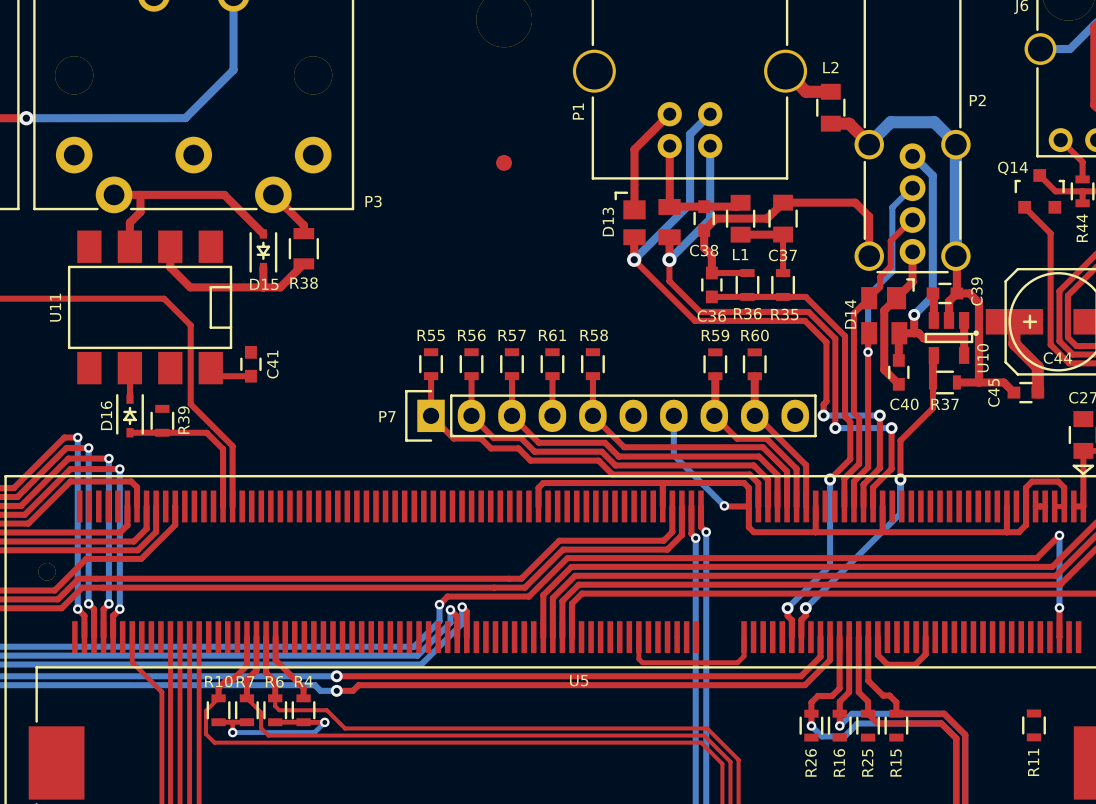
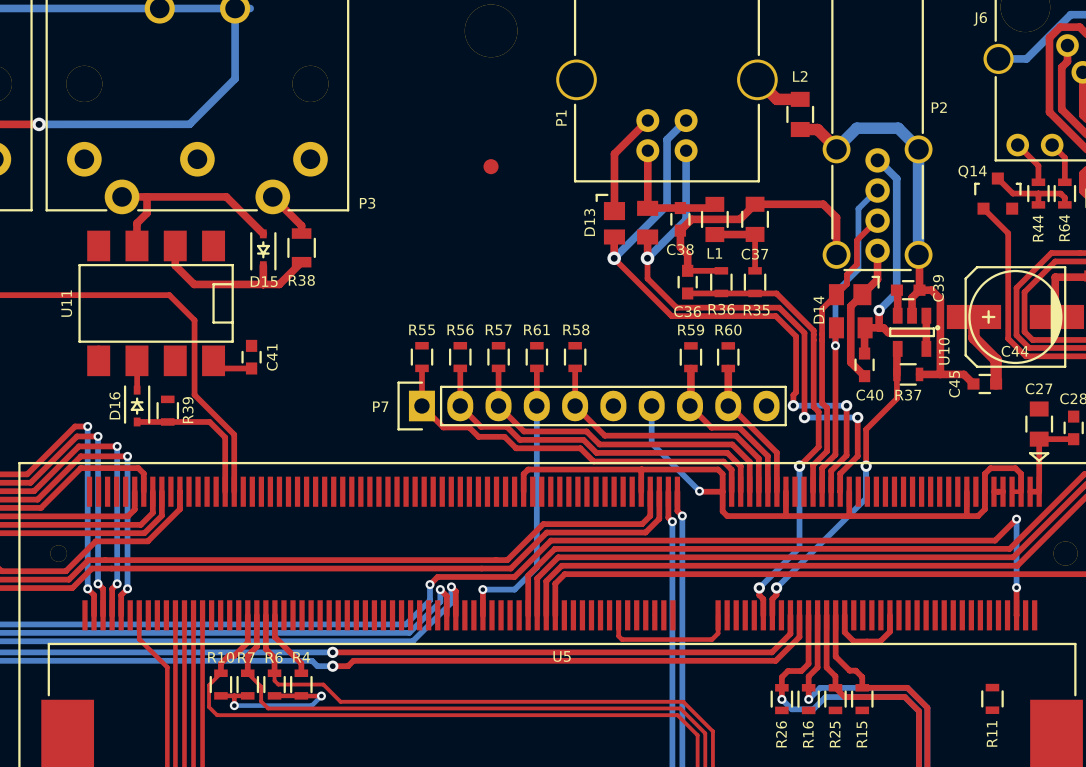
bottom track: none -> (536, 406) (536, 567) (514, 589) (482, 589)
via: none -> (482, 589)
top track: none -> (482, 589) (482, 615)

